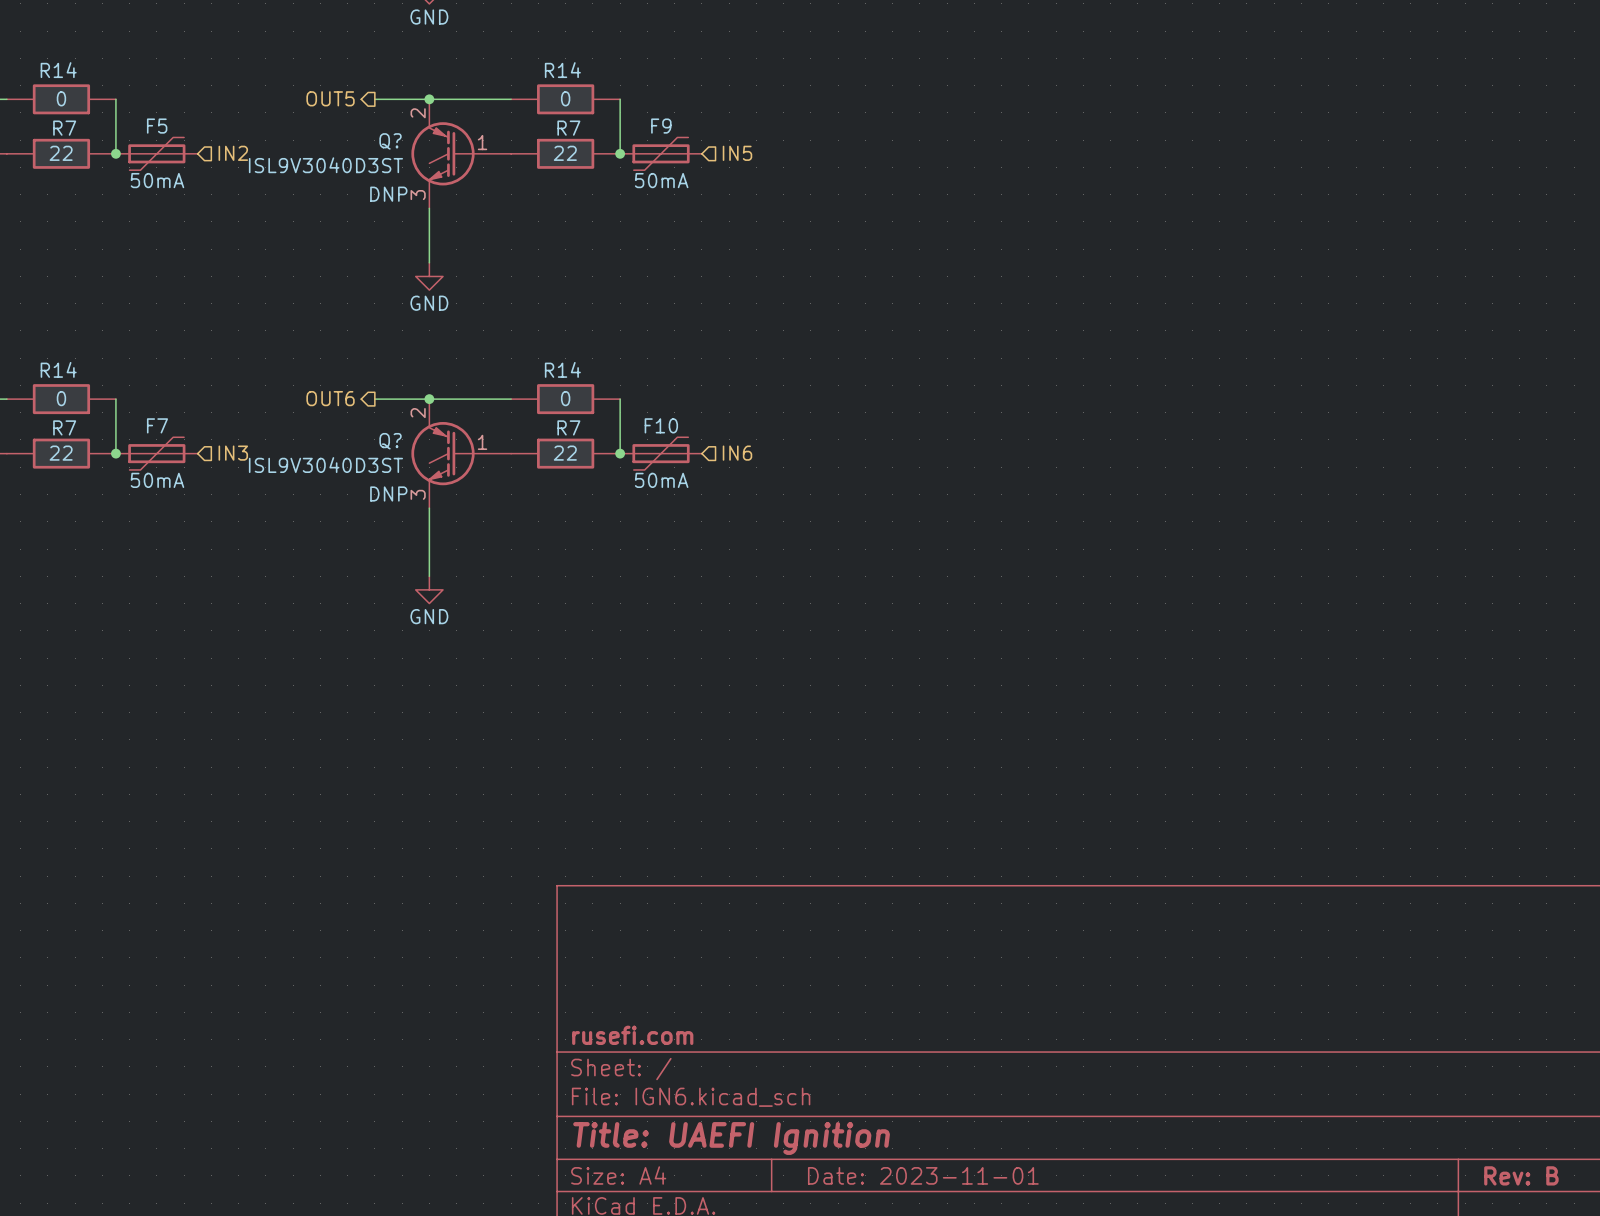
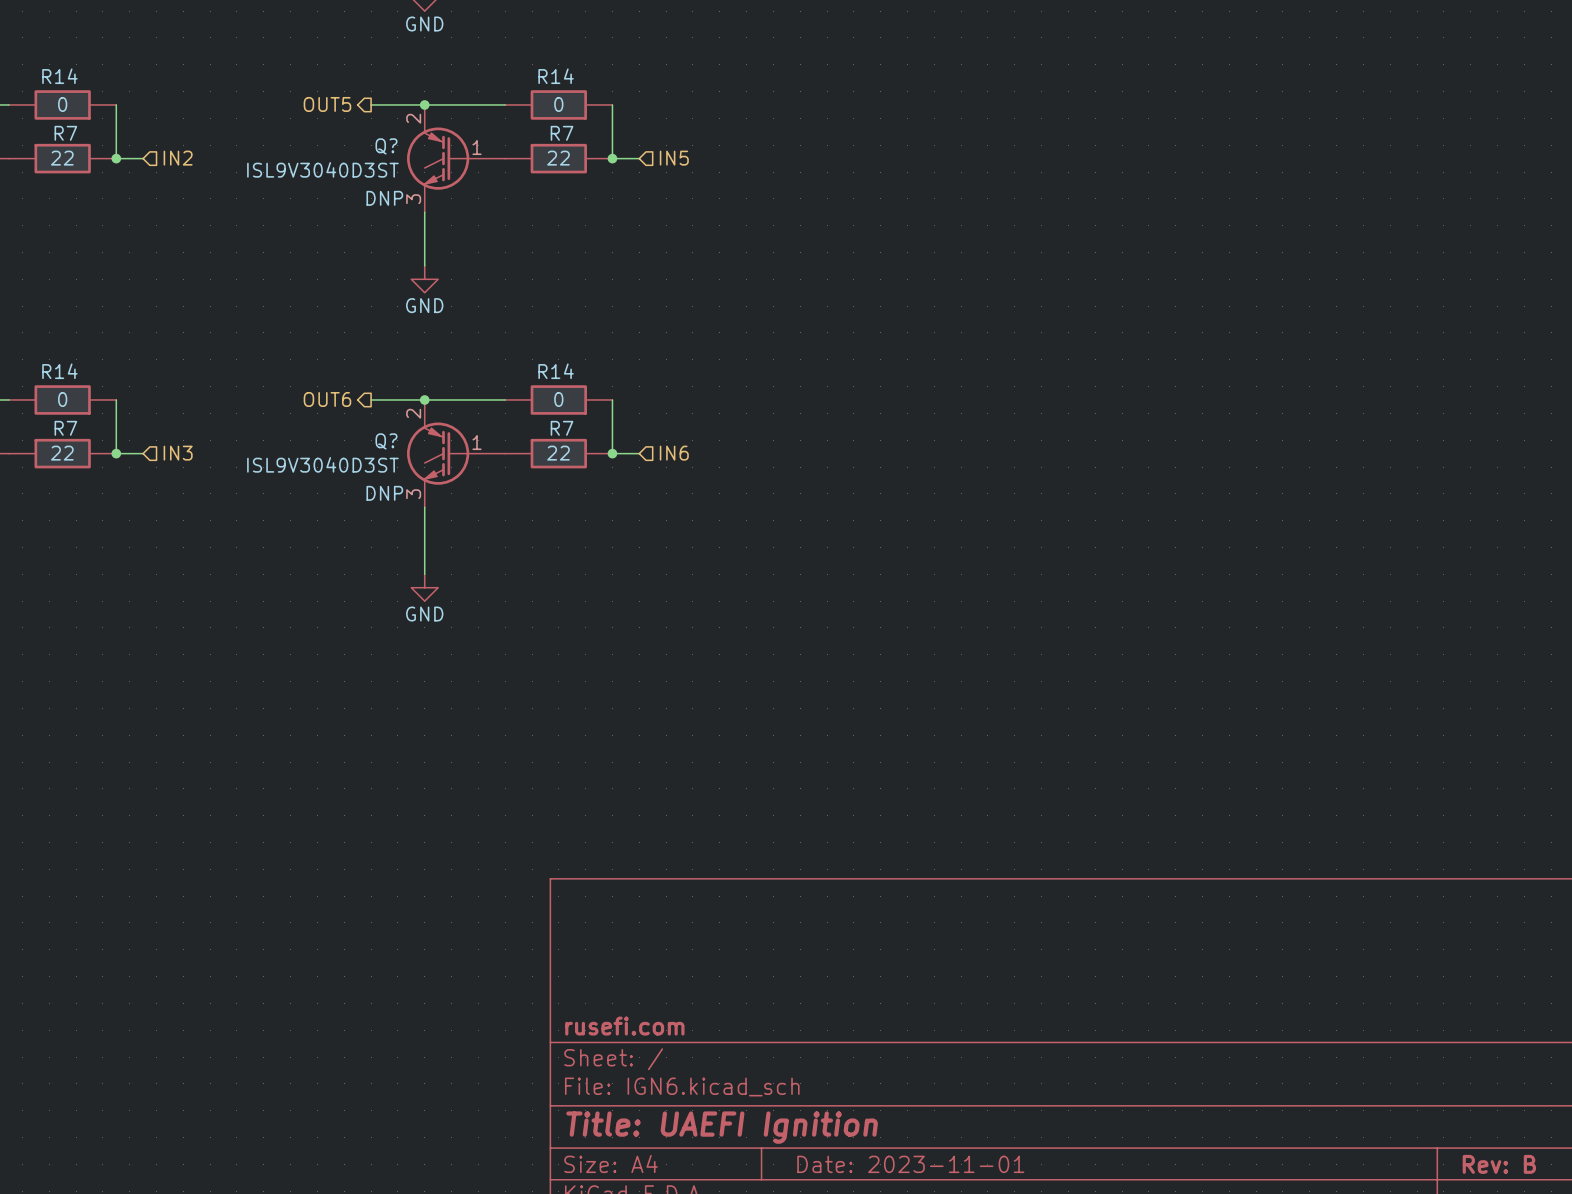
F5: 50mA (156, 153) -> none
hierarchical label position: IN2 (233, 153) -> IN2 (178, 158)
F9: 50mA (661, 153) -> none
hierarchical label position: IN5 (737, 153) -> IN5 (674, 158)
F7: 50mA (156, 453) -> none
hierarchical label position: IN3 (233, 453) -> IN3 (178, 453)
F10: 50mA (661, 453) -> none
hierarchical label position: IN6 (737, 453) -> IN6 (674, 453)

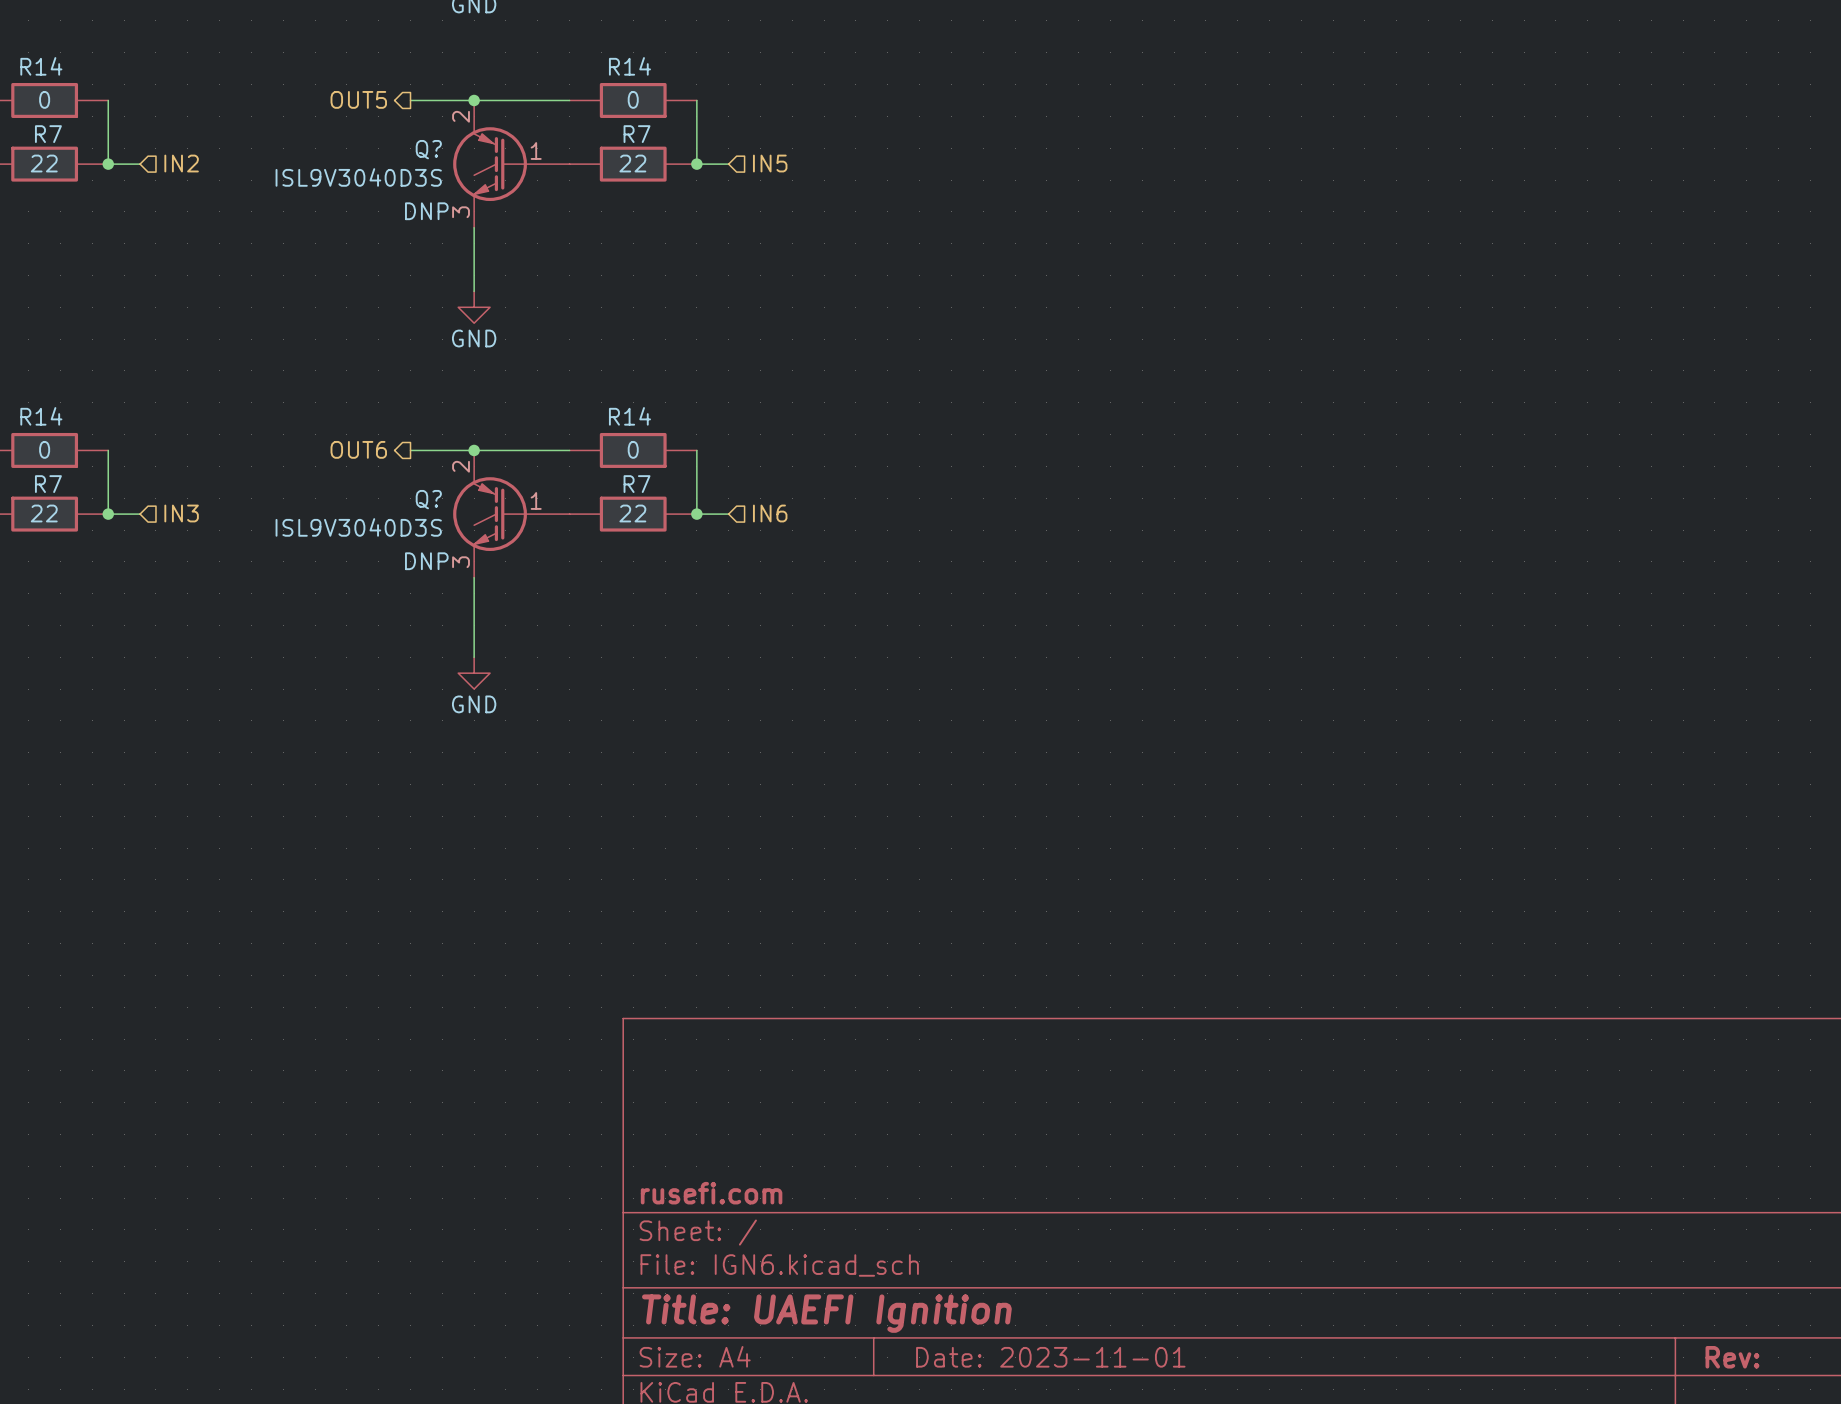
Q? value: ISL9V3040D3ST (322, 169) -> ISL9V3040D3S (358, 177)
Q? value: ISL9V3040D3ST (322, 464) -> ISL9V3040D3S (358, 527)
title block: Rev: B (1499, 1164) -> Rev: (1732, 1357)

